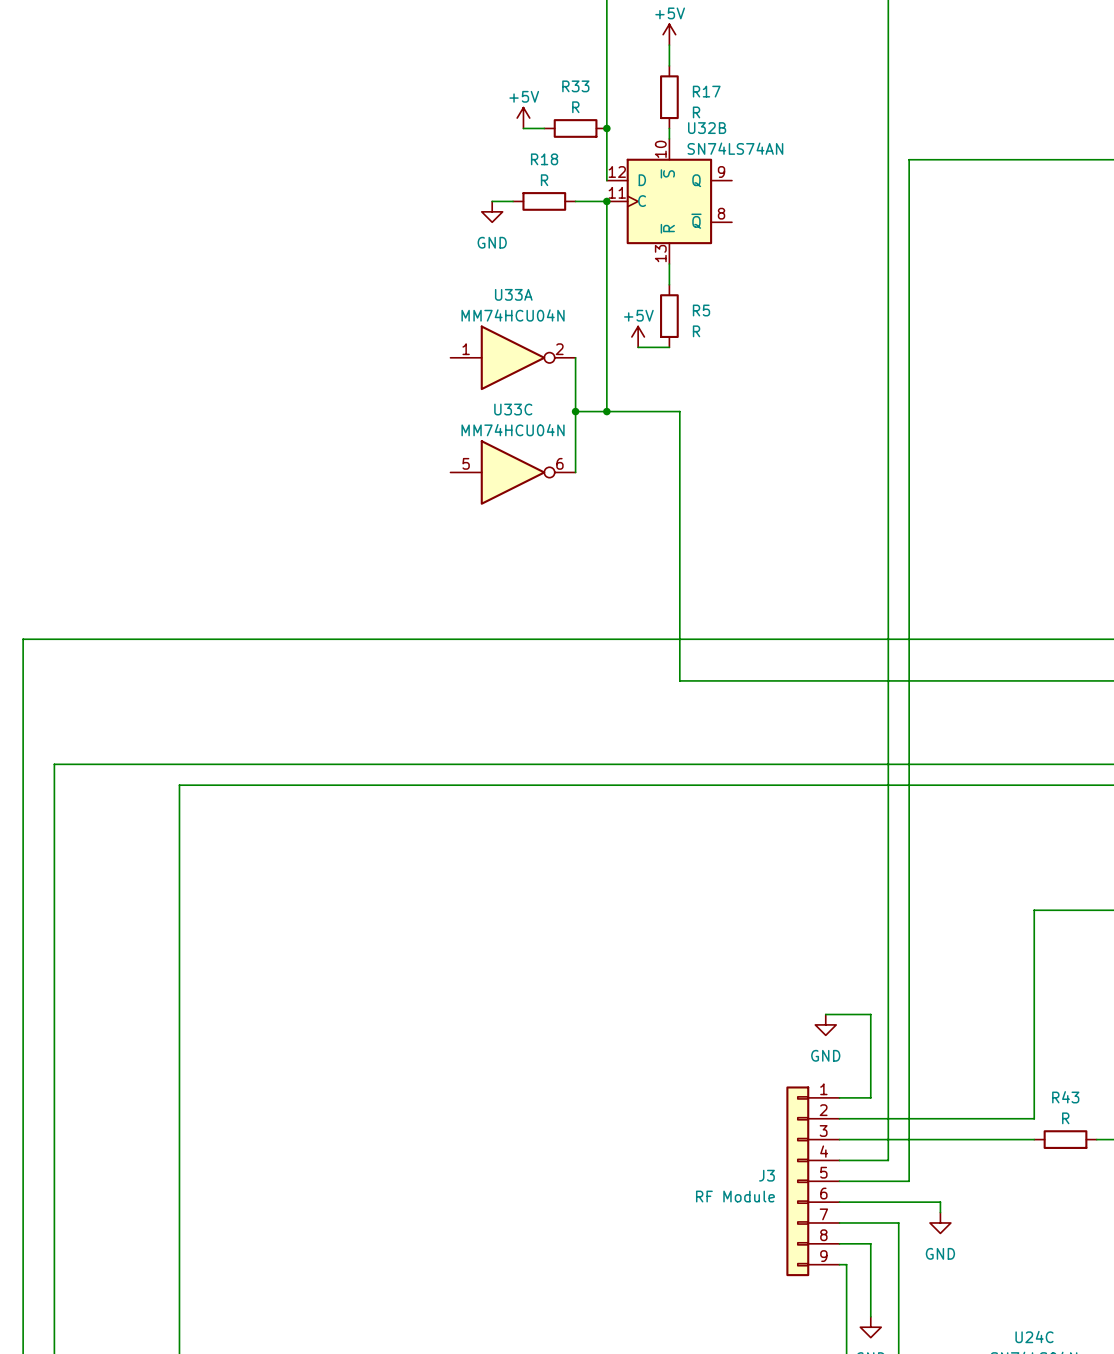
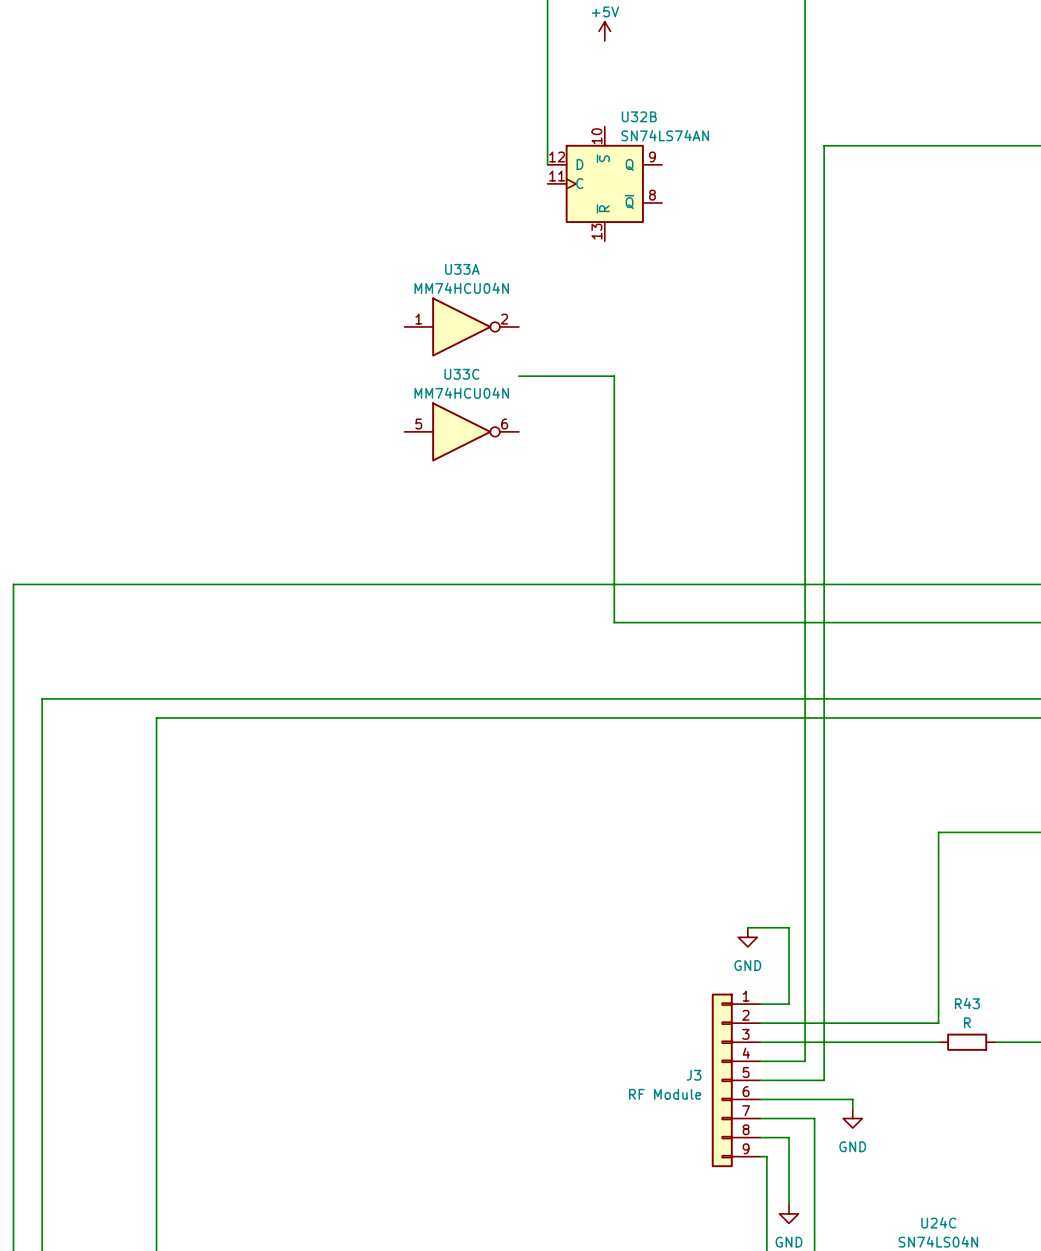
wire: (669, 45) (669, 65) -> none
R17: R (669, 97) -> none
power symbol: +5V (523, 118) -> none
wire: (523, 128) (544, 128) -> none
R33: R (575, 128) -> none
junction: (606, 128) -> none
wire: (669, 128) (669, 138) -> none
wire: (492, 201) (513, 201) -> none
R18: R (544, 201) -> none
wire: (575, 201) (606, 201) (606, 411) -> none
junction: (606, 201) -> none
power symbol: GND (492, 211) -> none
wire: (669, 263) (669, 284) -> none
R5: R (669, 316) -> none
power symbol: +5V (638, 336) -> none
wire: (638, 347) (669, 347) -> none
wire: (575, 357) (575, 472) -> none
junction: (575, 411) -> none
junction: (606, 411) -> none

